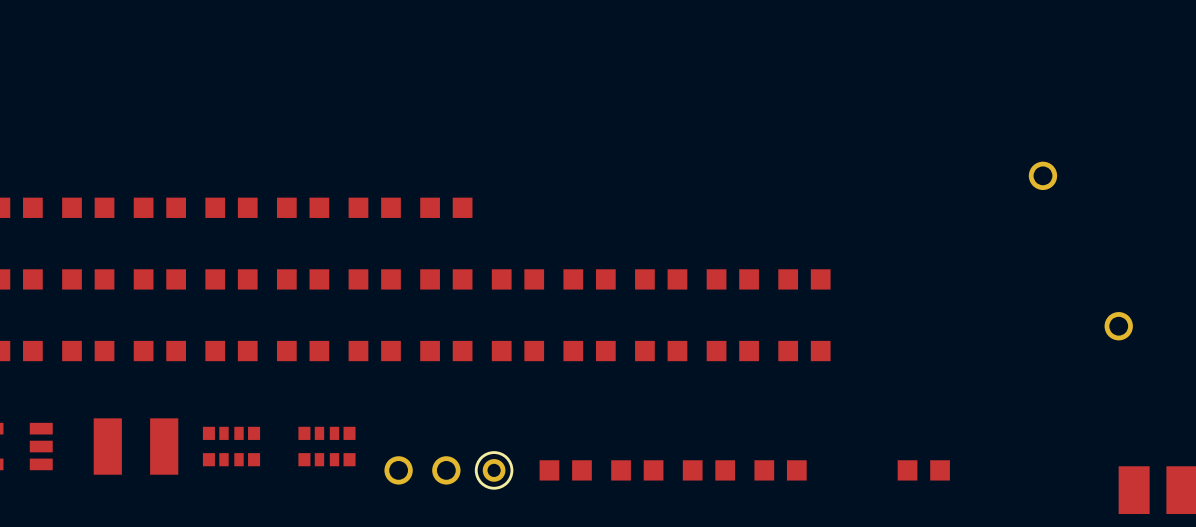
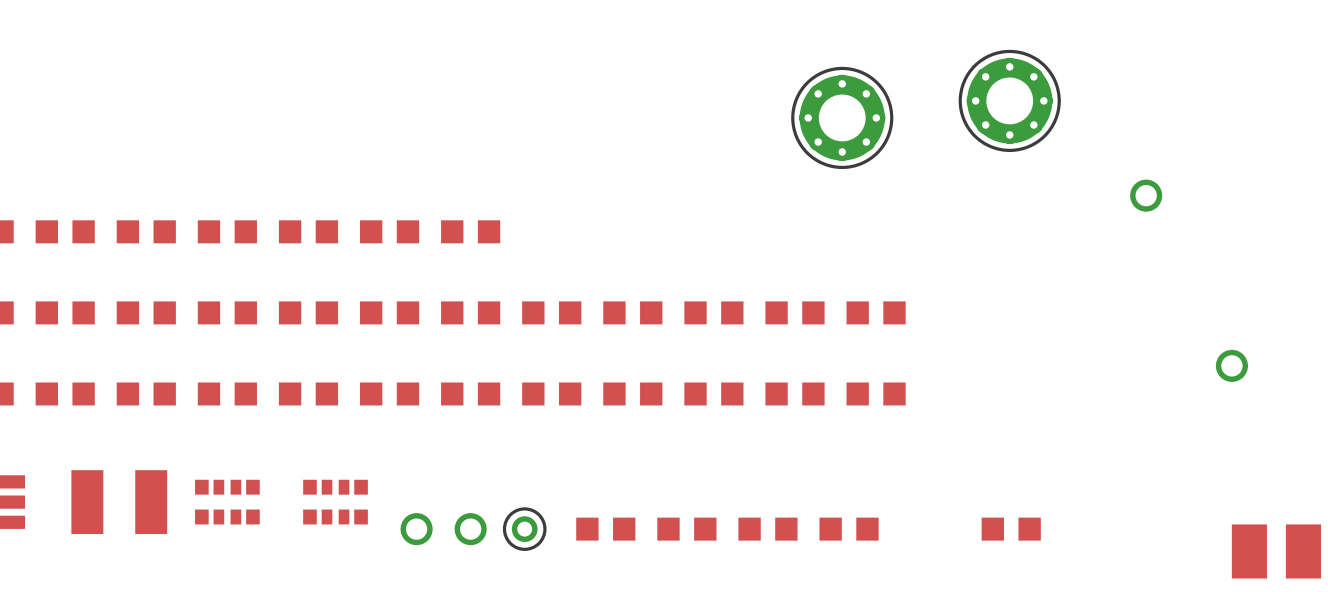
part: none -> (1009, 100)
part: none -> (842, 117)

